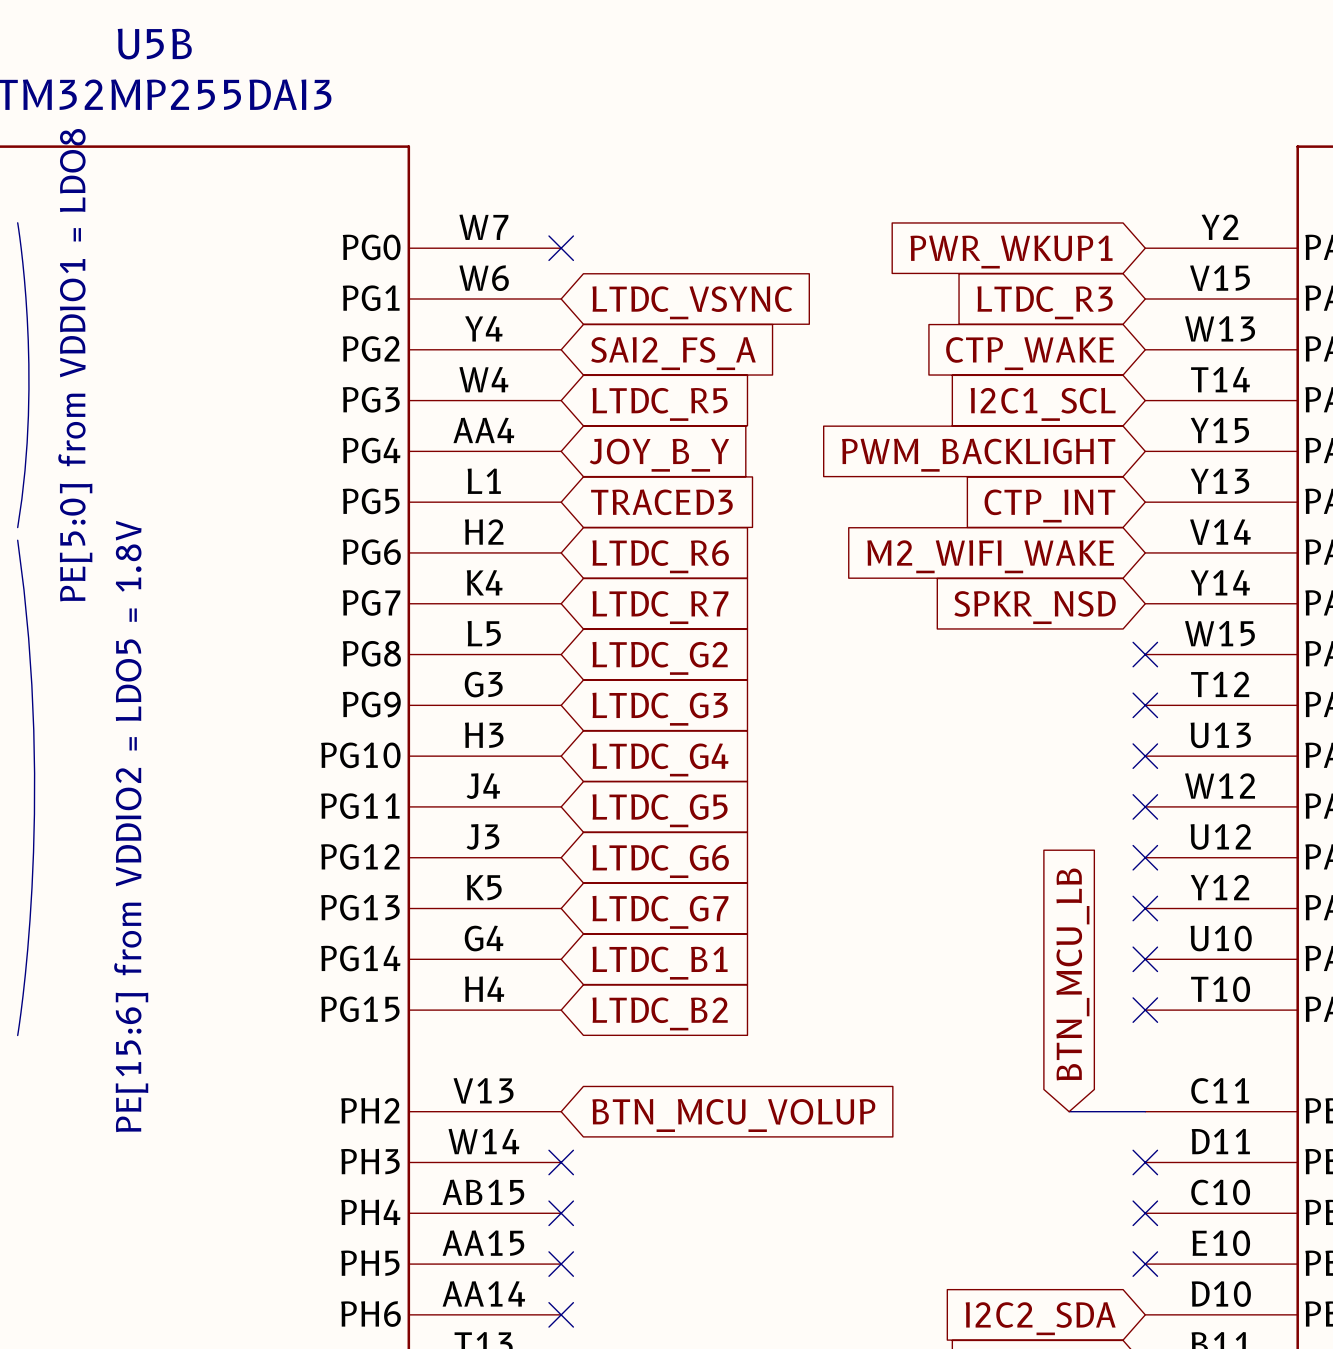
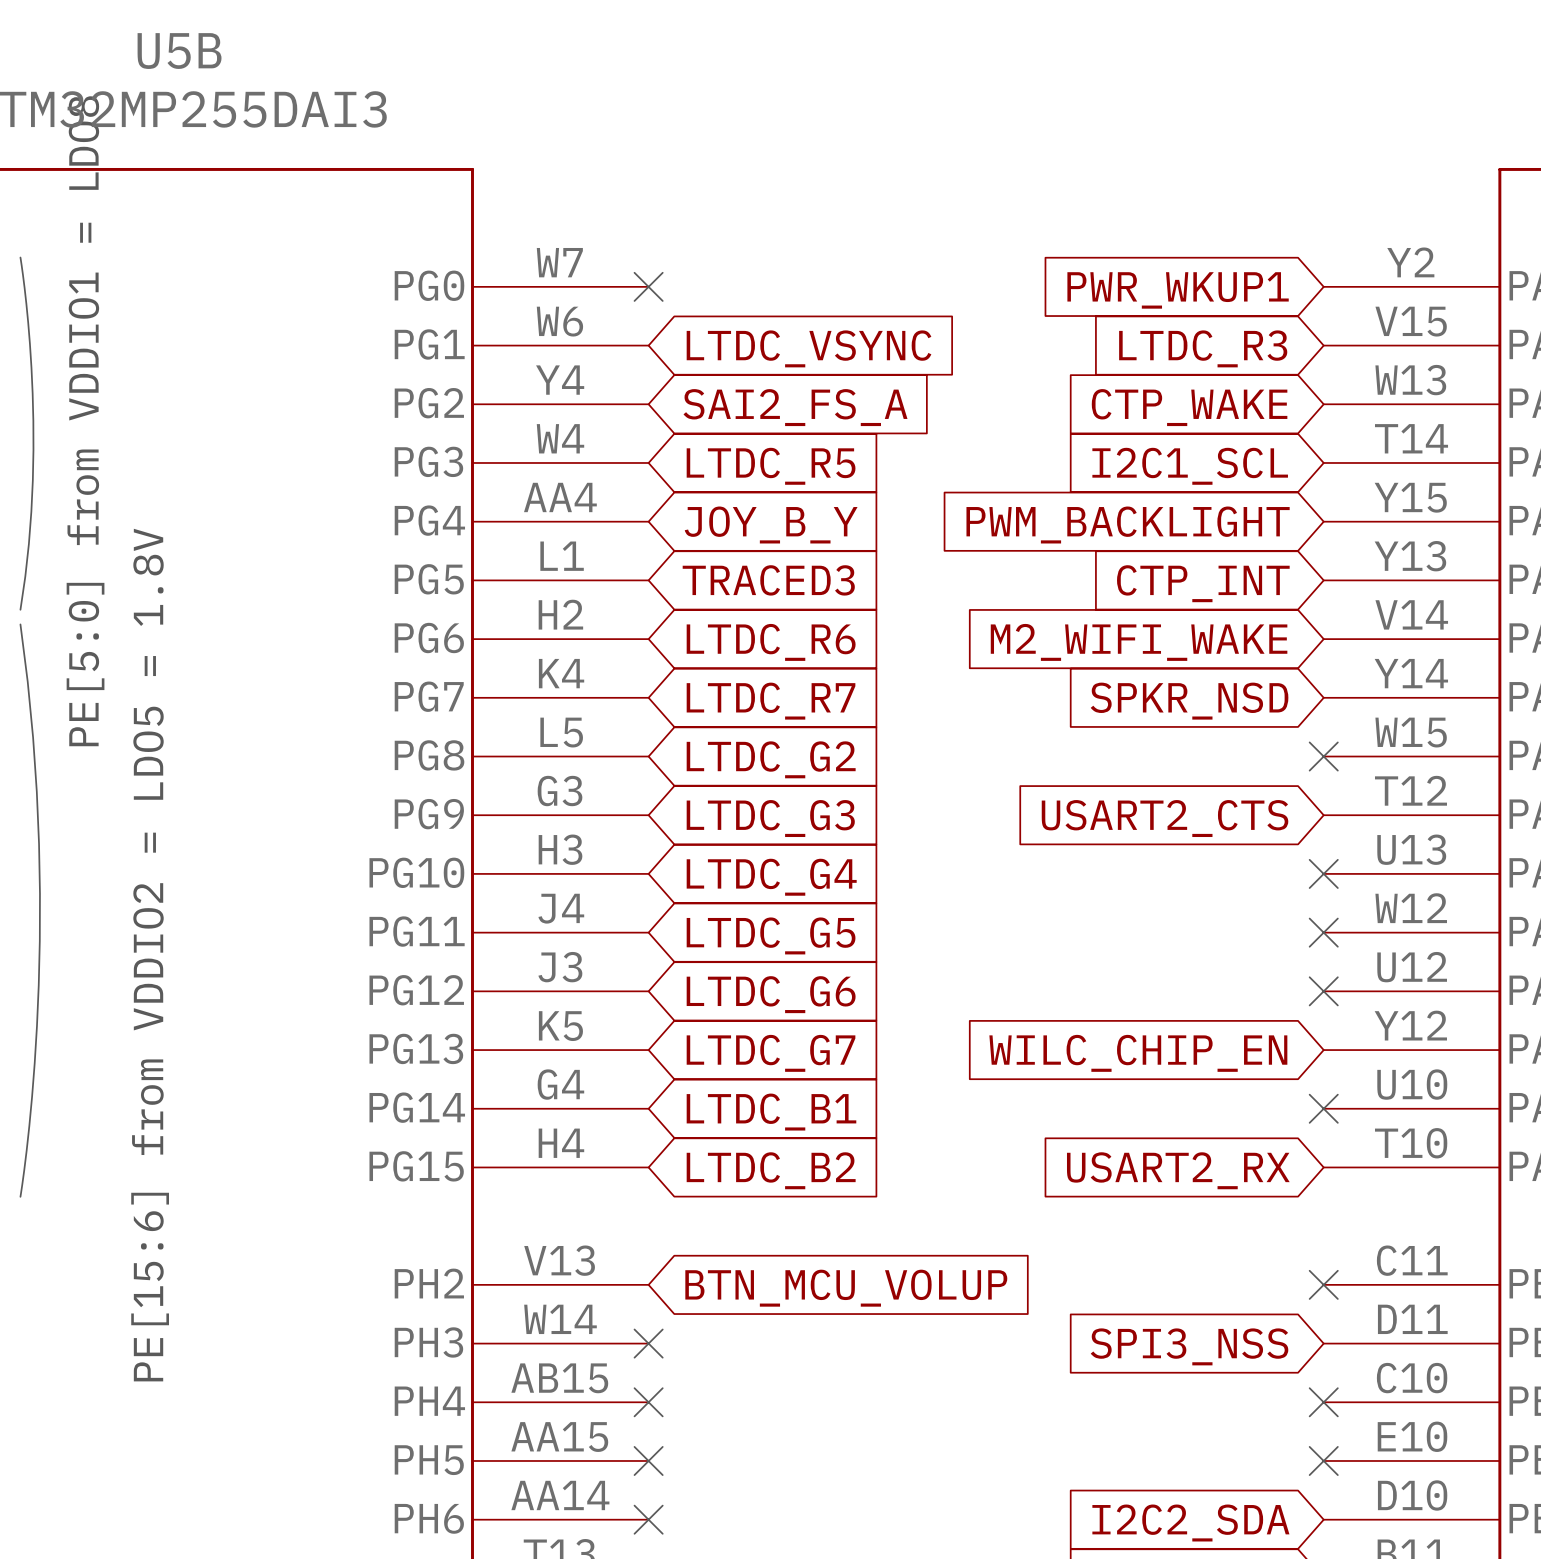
no-connect mark: (1145, 705) -> none
global label: none -> USART2_CTS (1165, 818)
no-connect mark: (1145, 908) -> none
global label: none -> WILC_CHIP_EN (1138, 1053)
global label: BTN_MCU_LB (1072, 974) -> none
no-connect mark: (1145, 1010) -> none
global label: none -> USART2_RX (1178, 1170)
wire: (1069, 1111) (1145, 1111) -> none
no-connect mark: none -> (1323, 1284)
no-connect mark: (1145, 1162) -> none
global label: none -> SPI3_NSS (1189, 1346)

